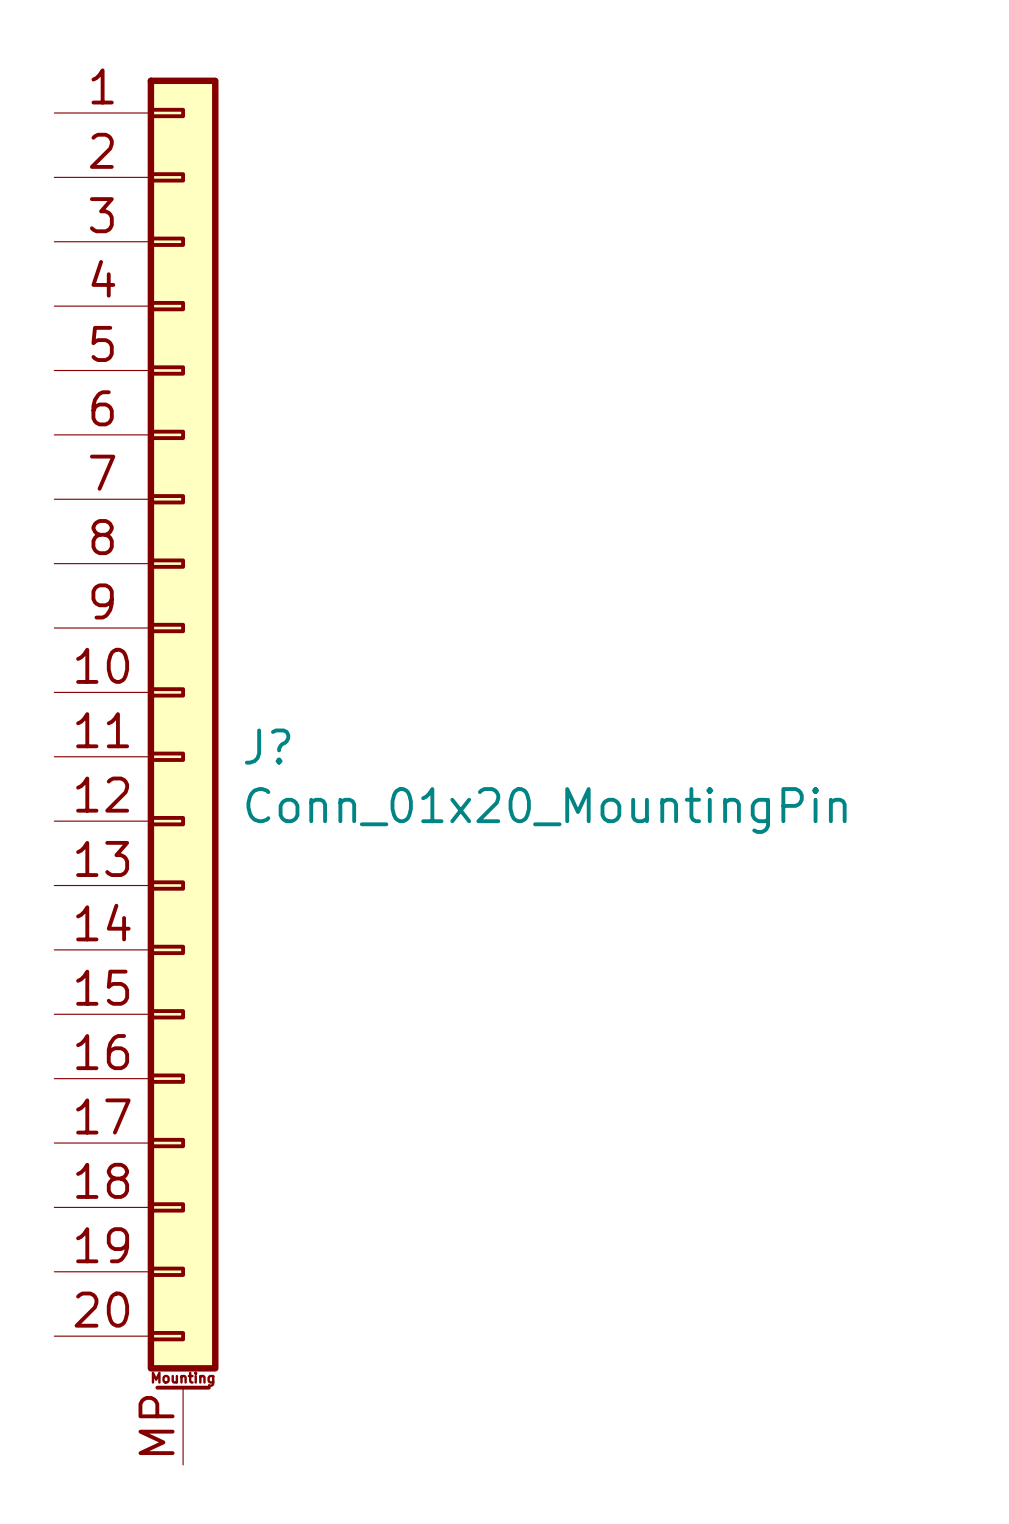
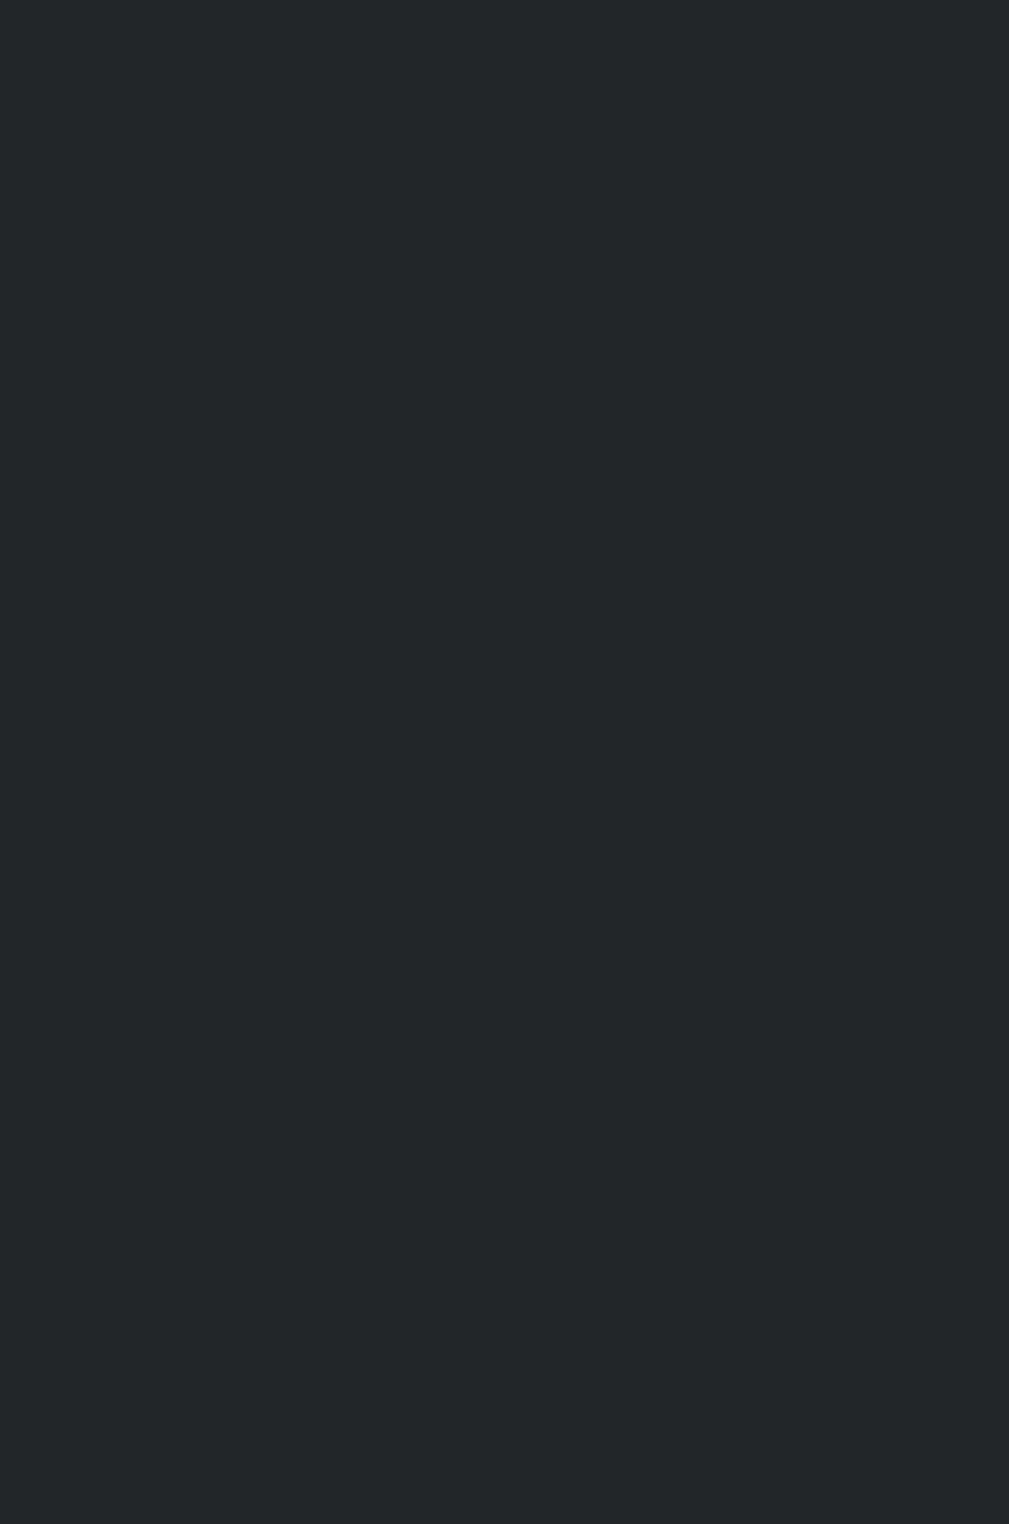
J?: Conn_01x20_MountingPin (136, 771) -> none

